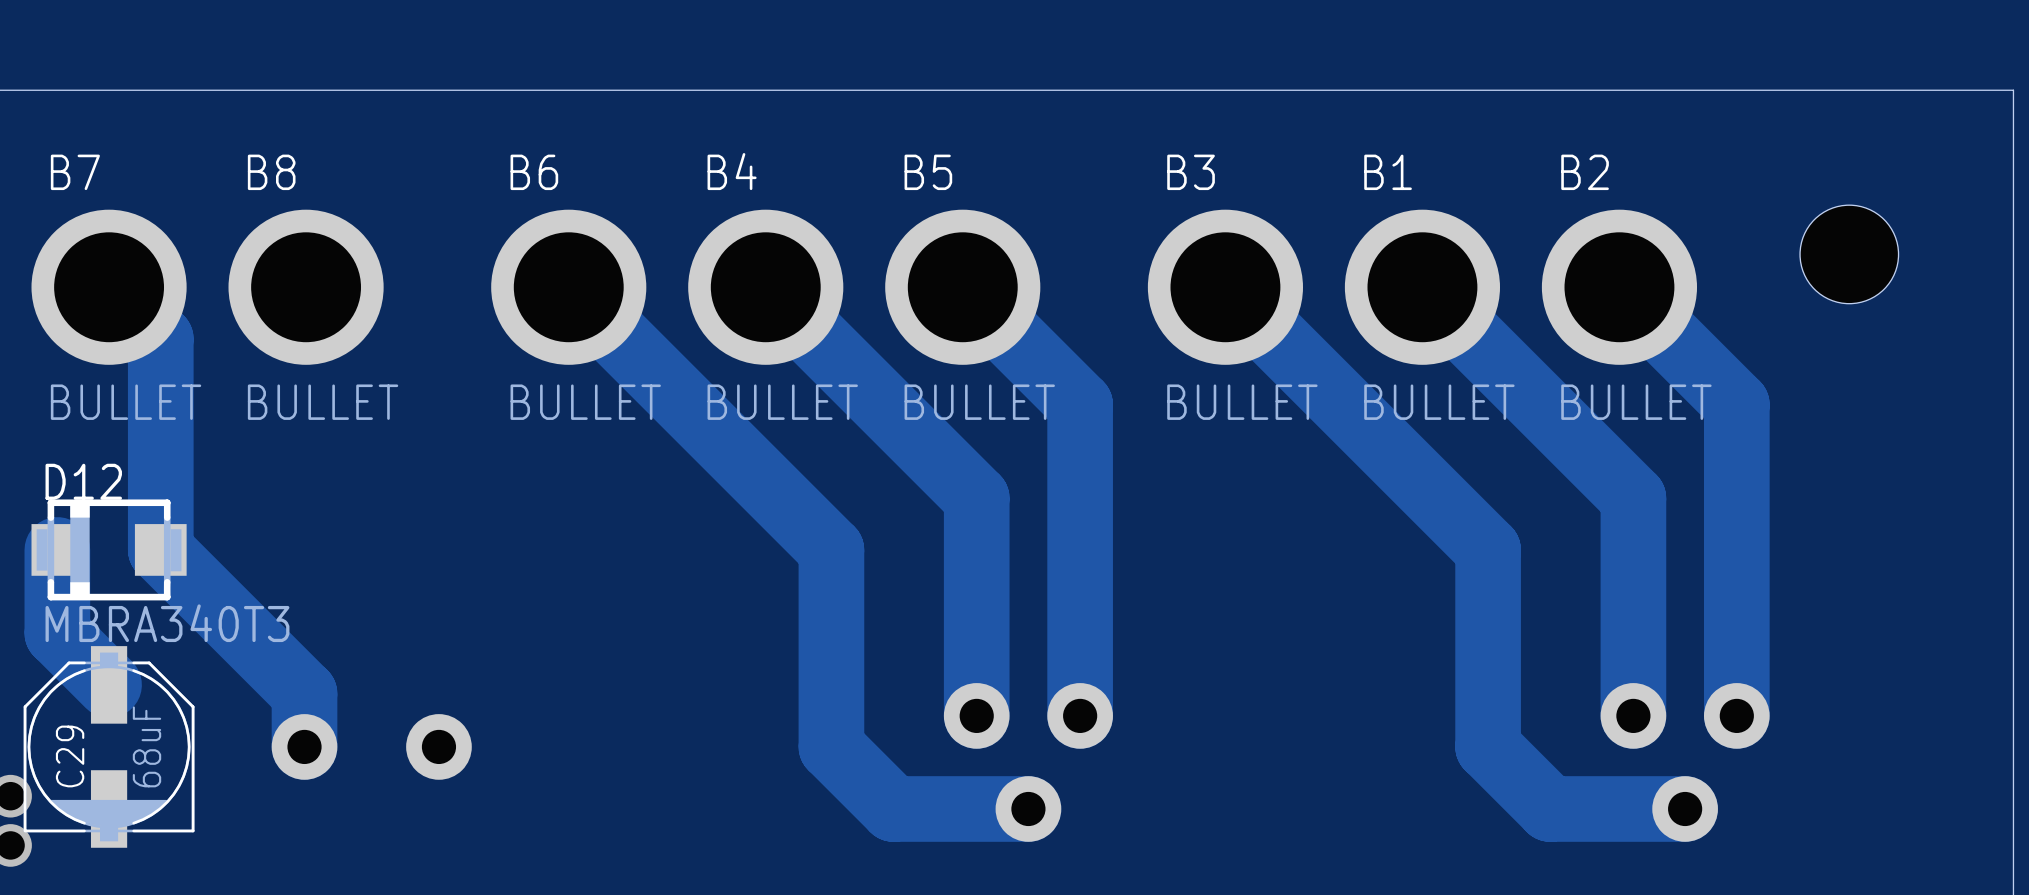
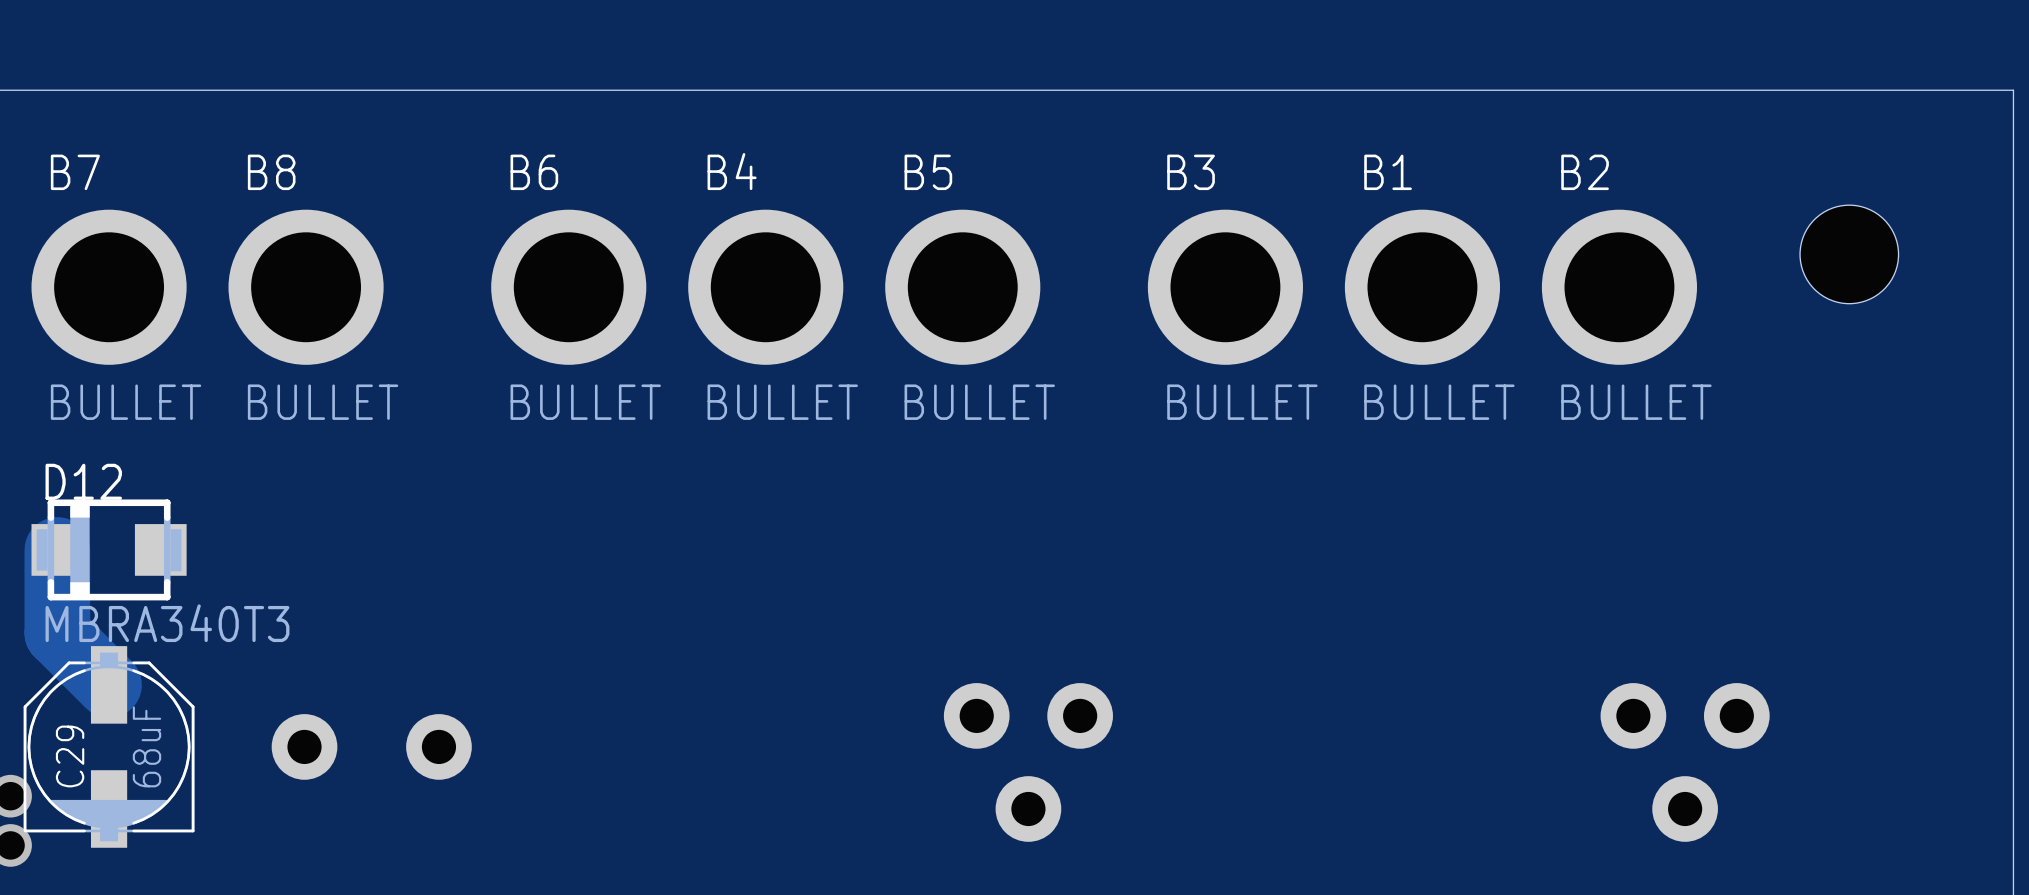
track: (109, 287) (160, 338) (160, 549) (304, 693) (304, 746) -> none
track: (568, 287) (831, 549) (831, 746) (893, 808) (1028, 808) -> none
track: (765, 287) (976, 498) (976, 715) -> none
track: (962, 287) (1080, 404) (1080, 715) -> none
track: (1225, 287) (1488, 549) (1488, 746) (1550, 808) (1685, 808) -> none
track: (1422, 287) (1633, 498) (1633, 715) -> none
track: (1619, 287) (1736, 404) (1736, 715) -> none

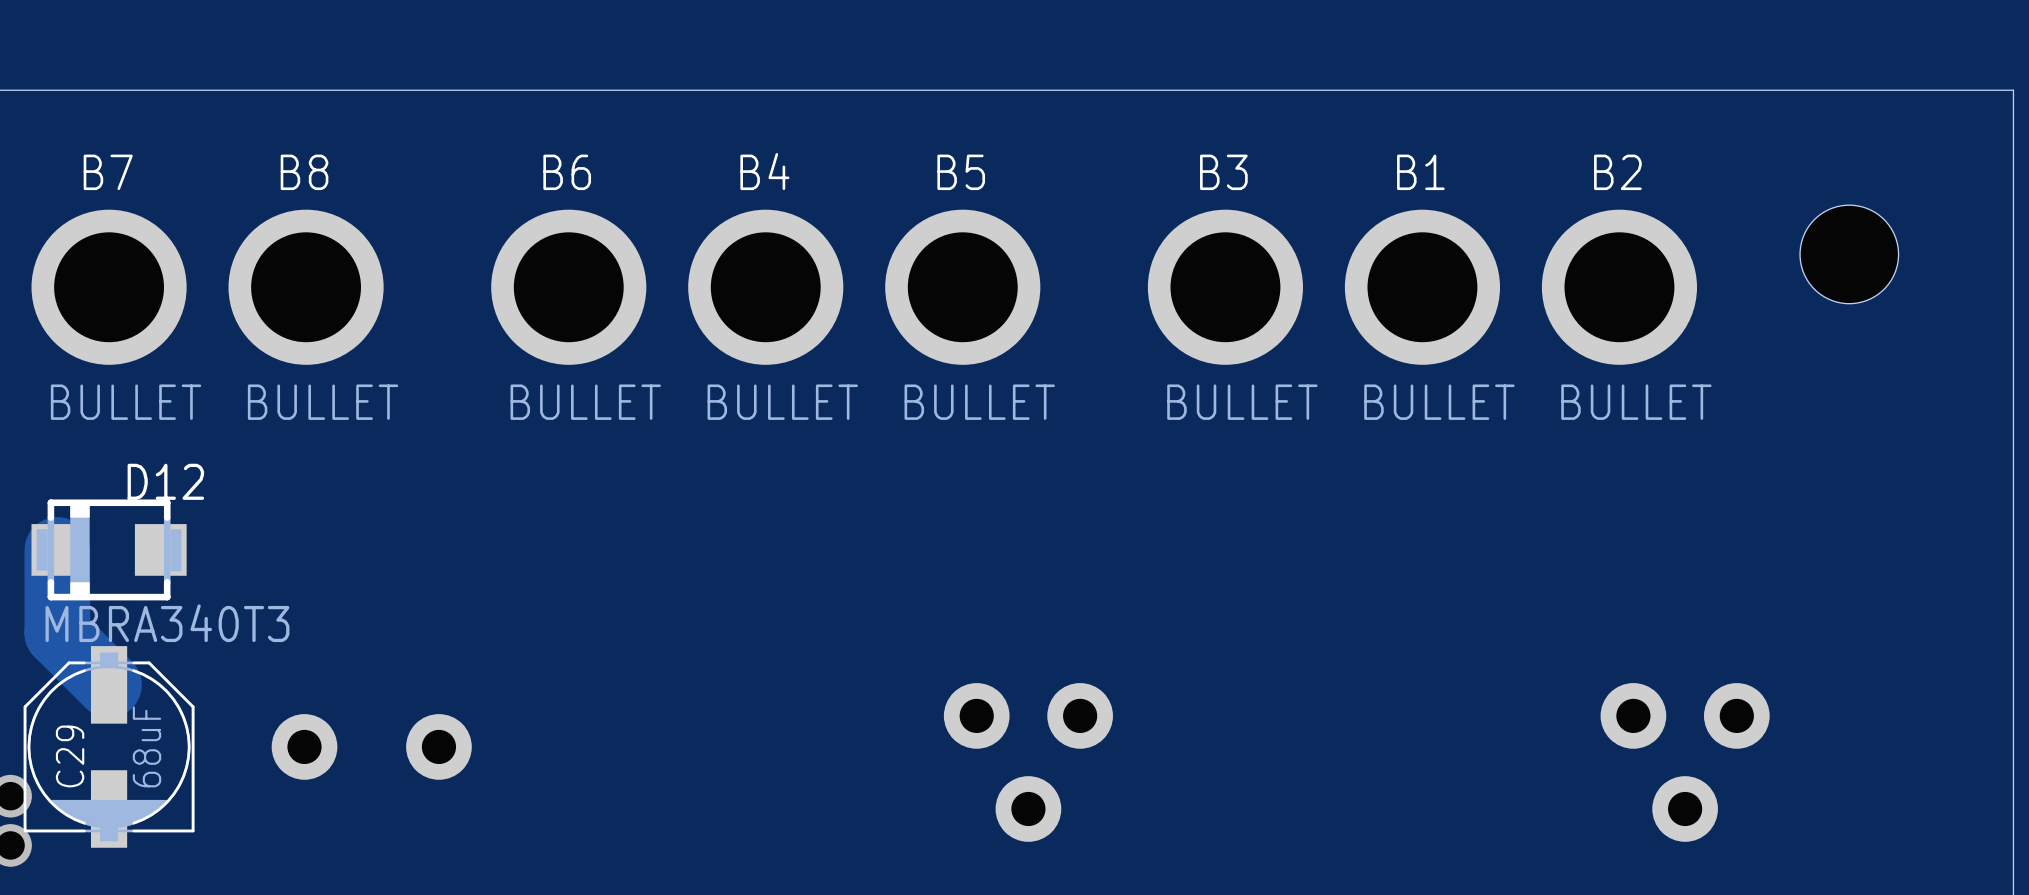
B4 name position: B4 (732, 171) -> B4 (764, 171)
B7 name position: B7 (75, 172) -> B7 (108, 172)
B8 name position: B8 (271, 172) -> B8 (304, 172)
B6 name position: B6 (534, 172) -> B6 (567, 172)
B5 name position: B5 (928, 172) -> B5 (961, 172)
B3 name position: B3 (1191, 172) -> B3 (1223, 172)
B1 name position: B1 (1388, 172) -> B1 (1420, 172)
B2 name position: B2 (1585, 172) -> B2 (1617, 172)
D12 name position: D12 (83, 481) -> D12 (165, 481)

